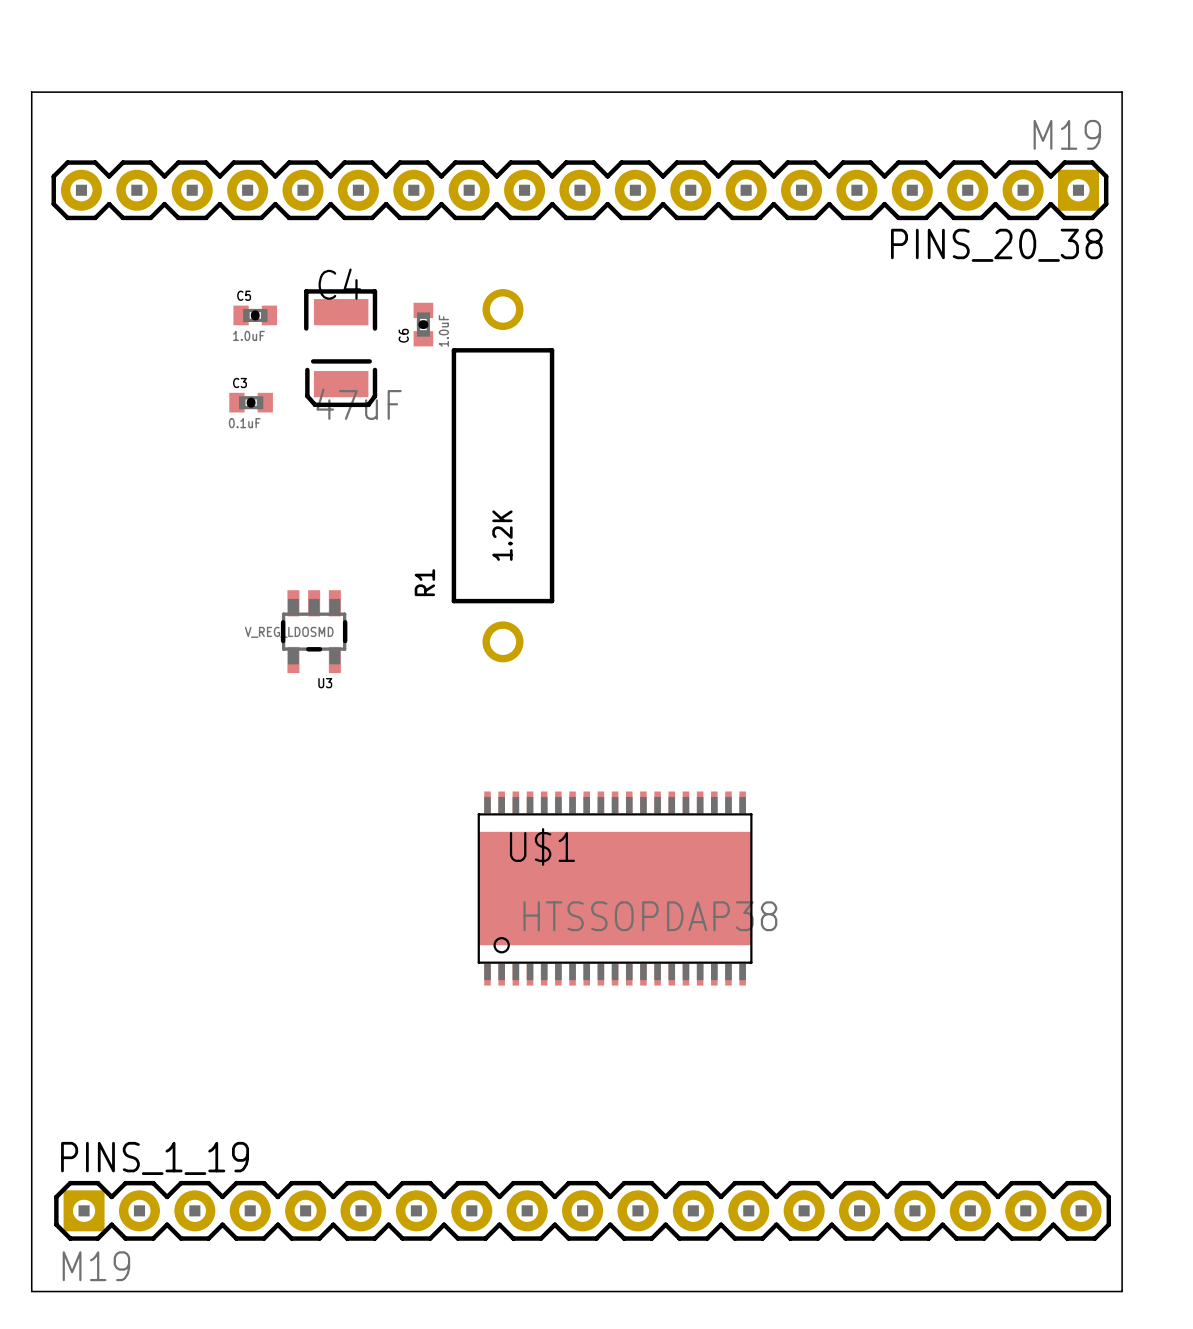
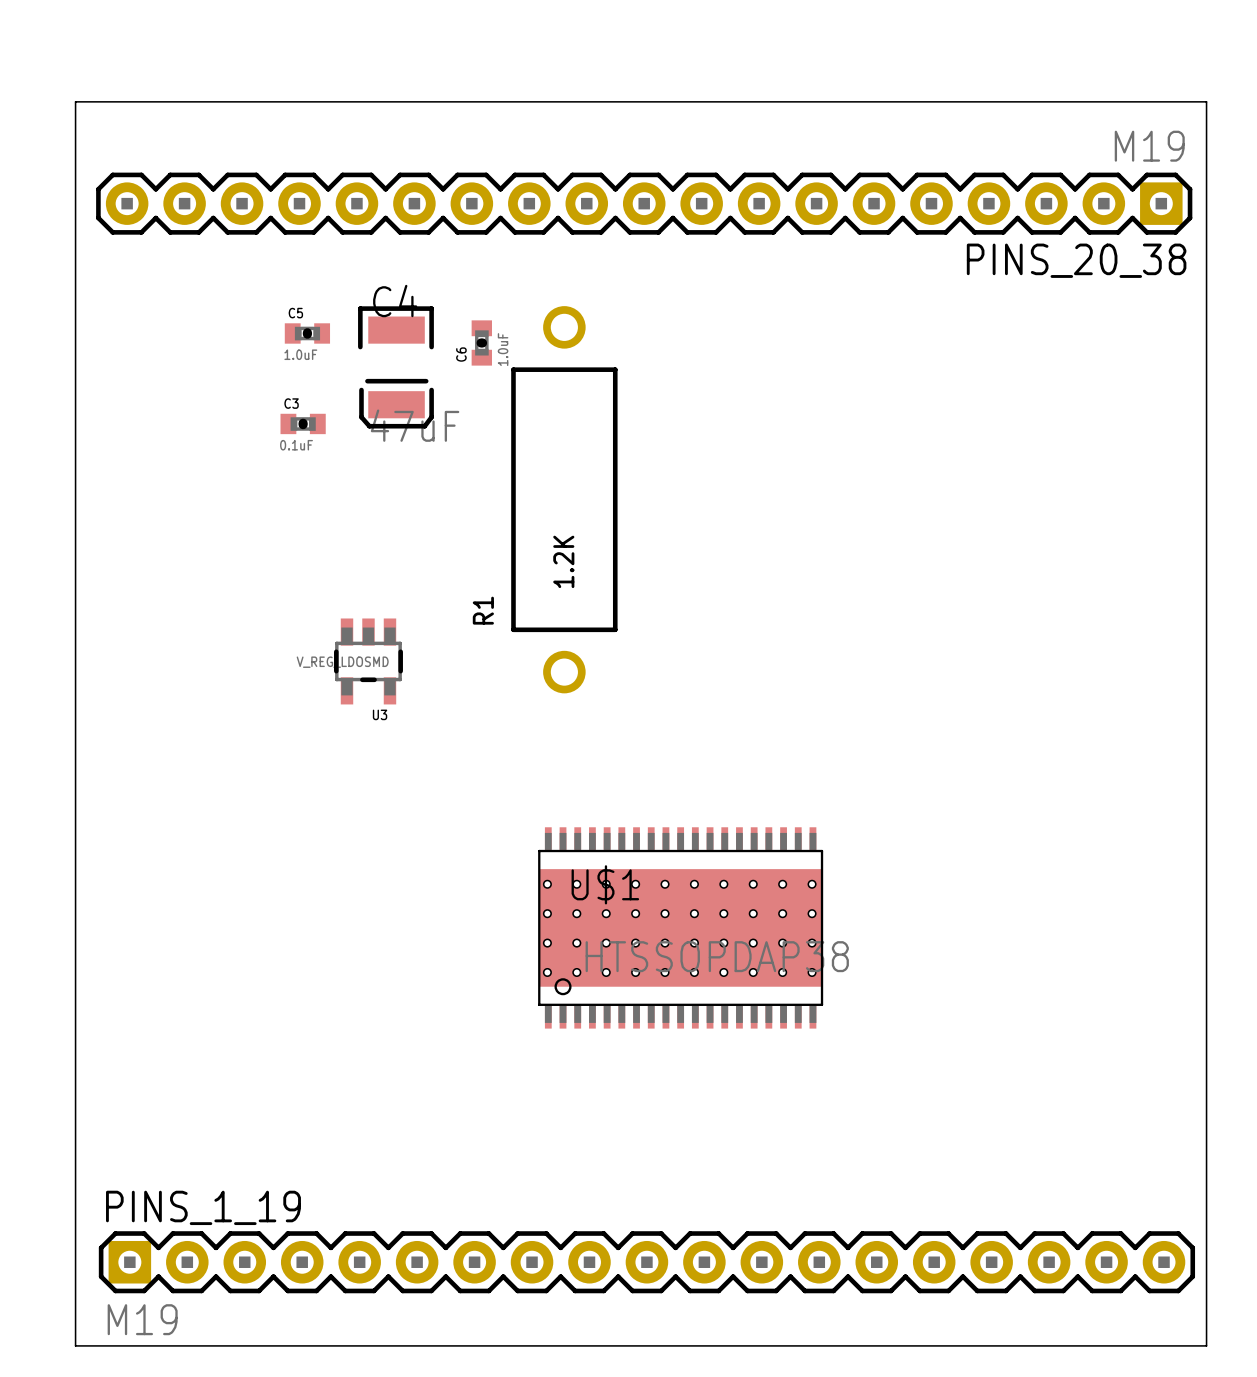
U$1 footprint: [477, 791, 753, 986] -> [538, 827, 824, 1029]

